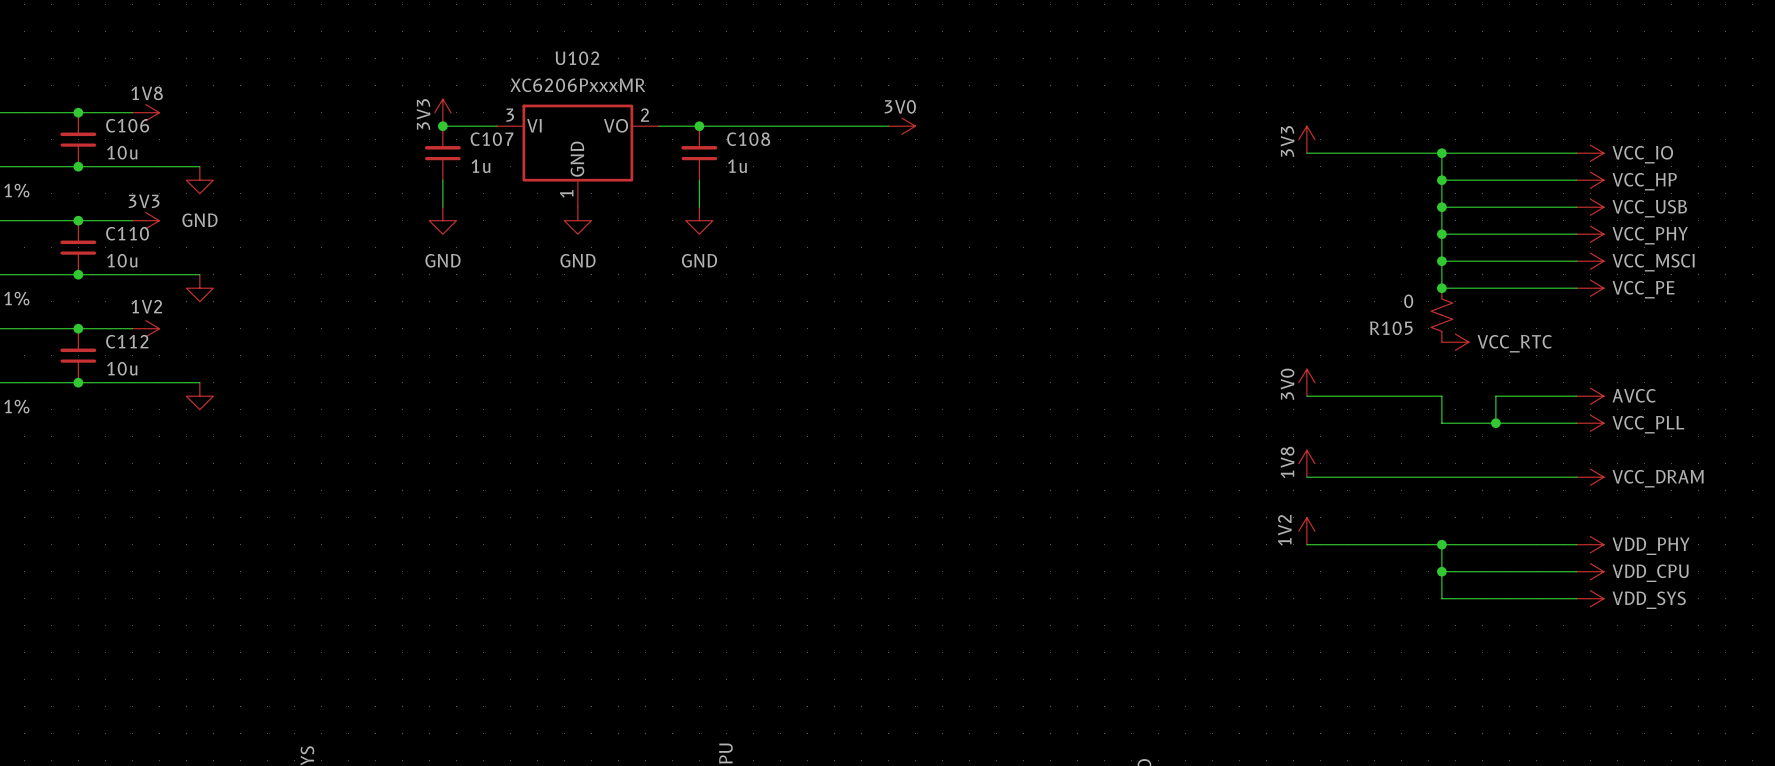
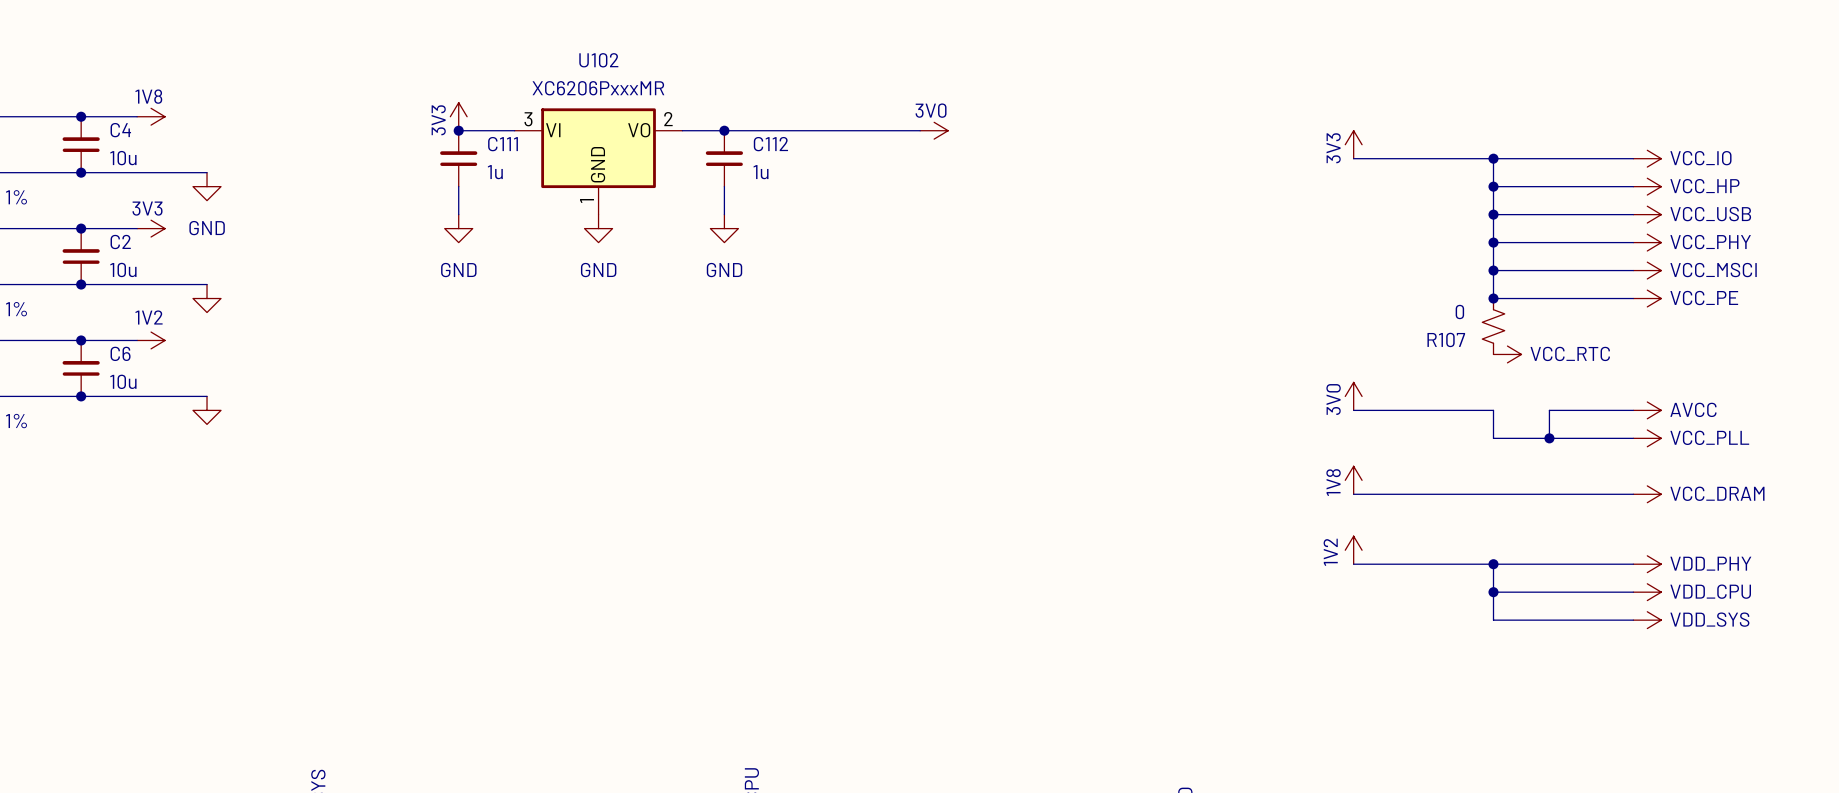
C106 name: C106 (127, 125) -> C4 (120, 130)
C107 name: C107 (492, 139) -> C111 (503, 144)
C108 name: C108 (748, 139) -> C112 (770, 144)
C110 name: C110 (127, 233) -> C2 (120, 242)
R105 name: R105 (1391, 328) -> R107 (1446, 339)
C112 name: C112 (127, 341) -> C6 (120, 353)

